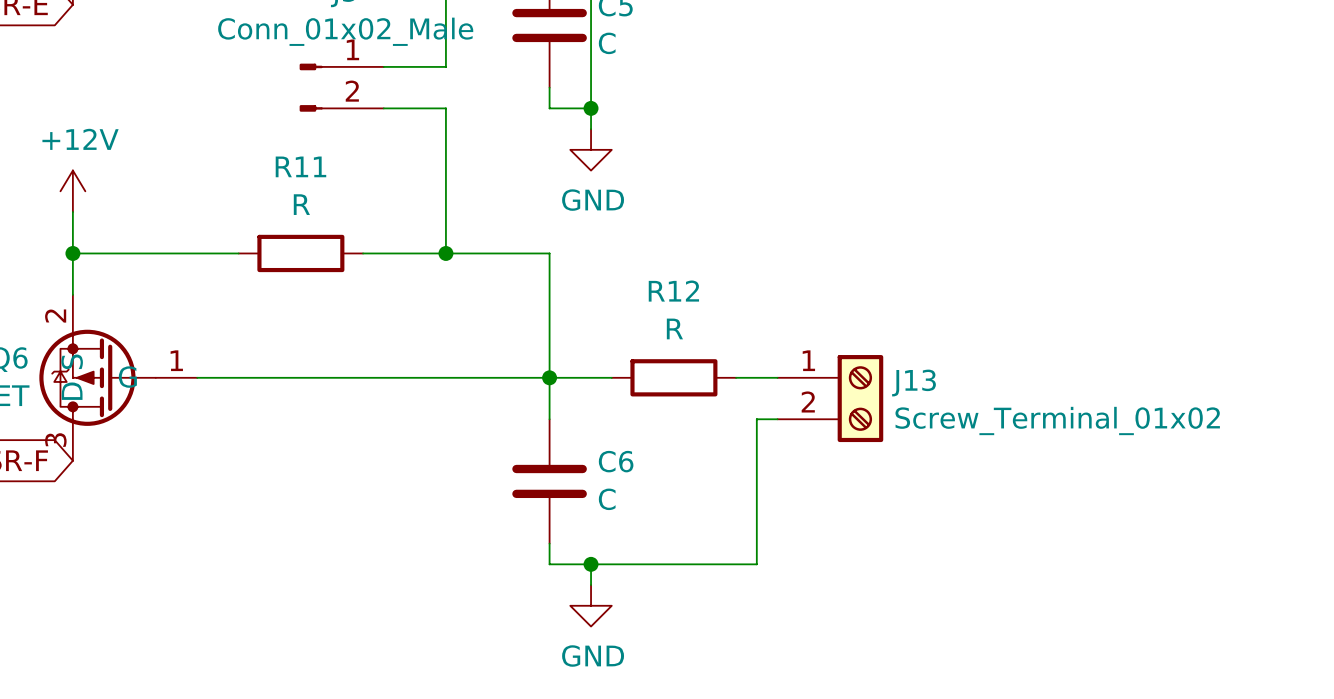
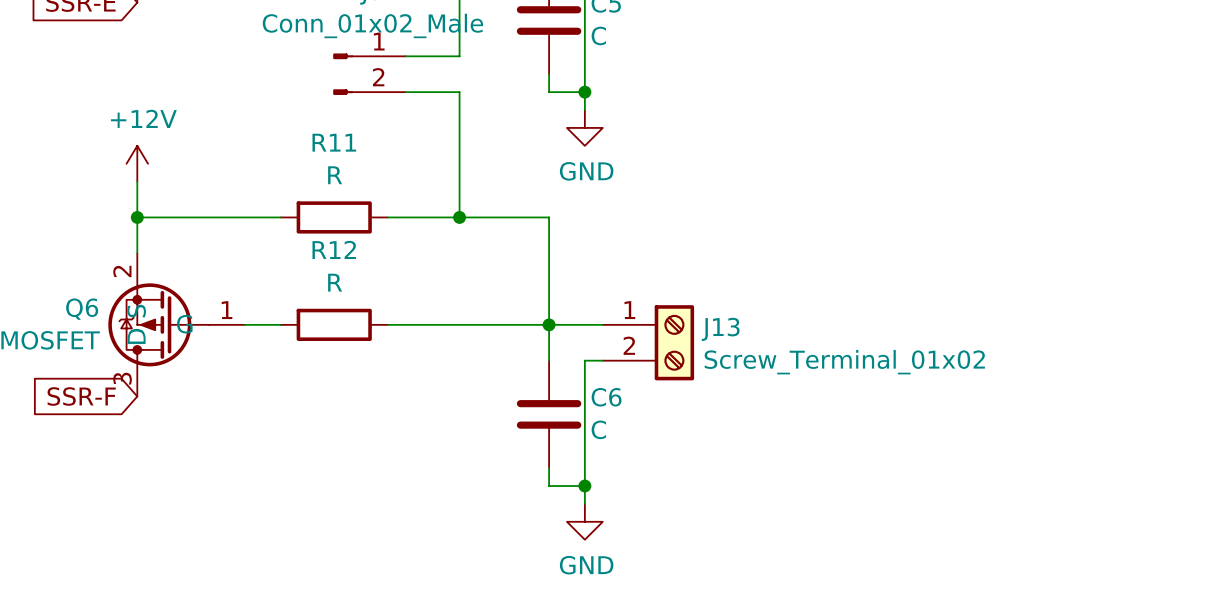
wire: (238, 377) (363, 377) -> none
R12 position: (673, 377) -> (334, 324)
wire: (736, 377) (777, 377) -> none
J13 position: (830, 398) -> (648, 342)
wire: (777, 419) (756, 419) (756, 564) (591, 564) -> (602, 360) (584, 360) (584, 486)

